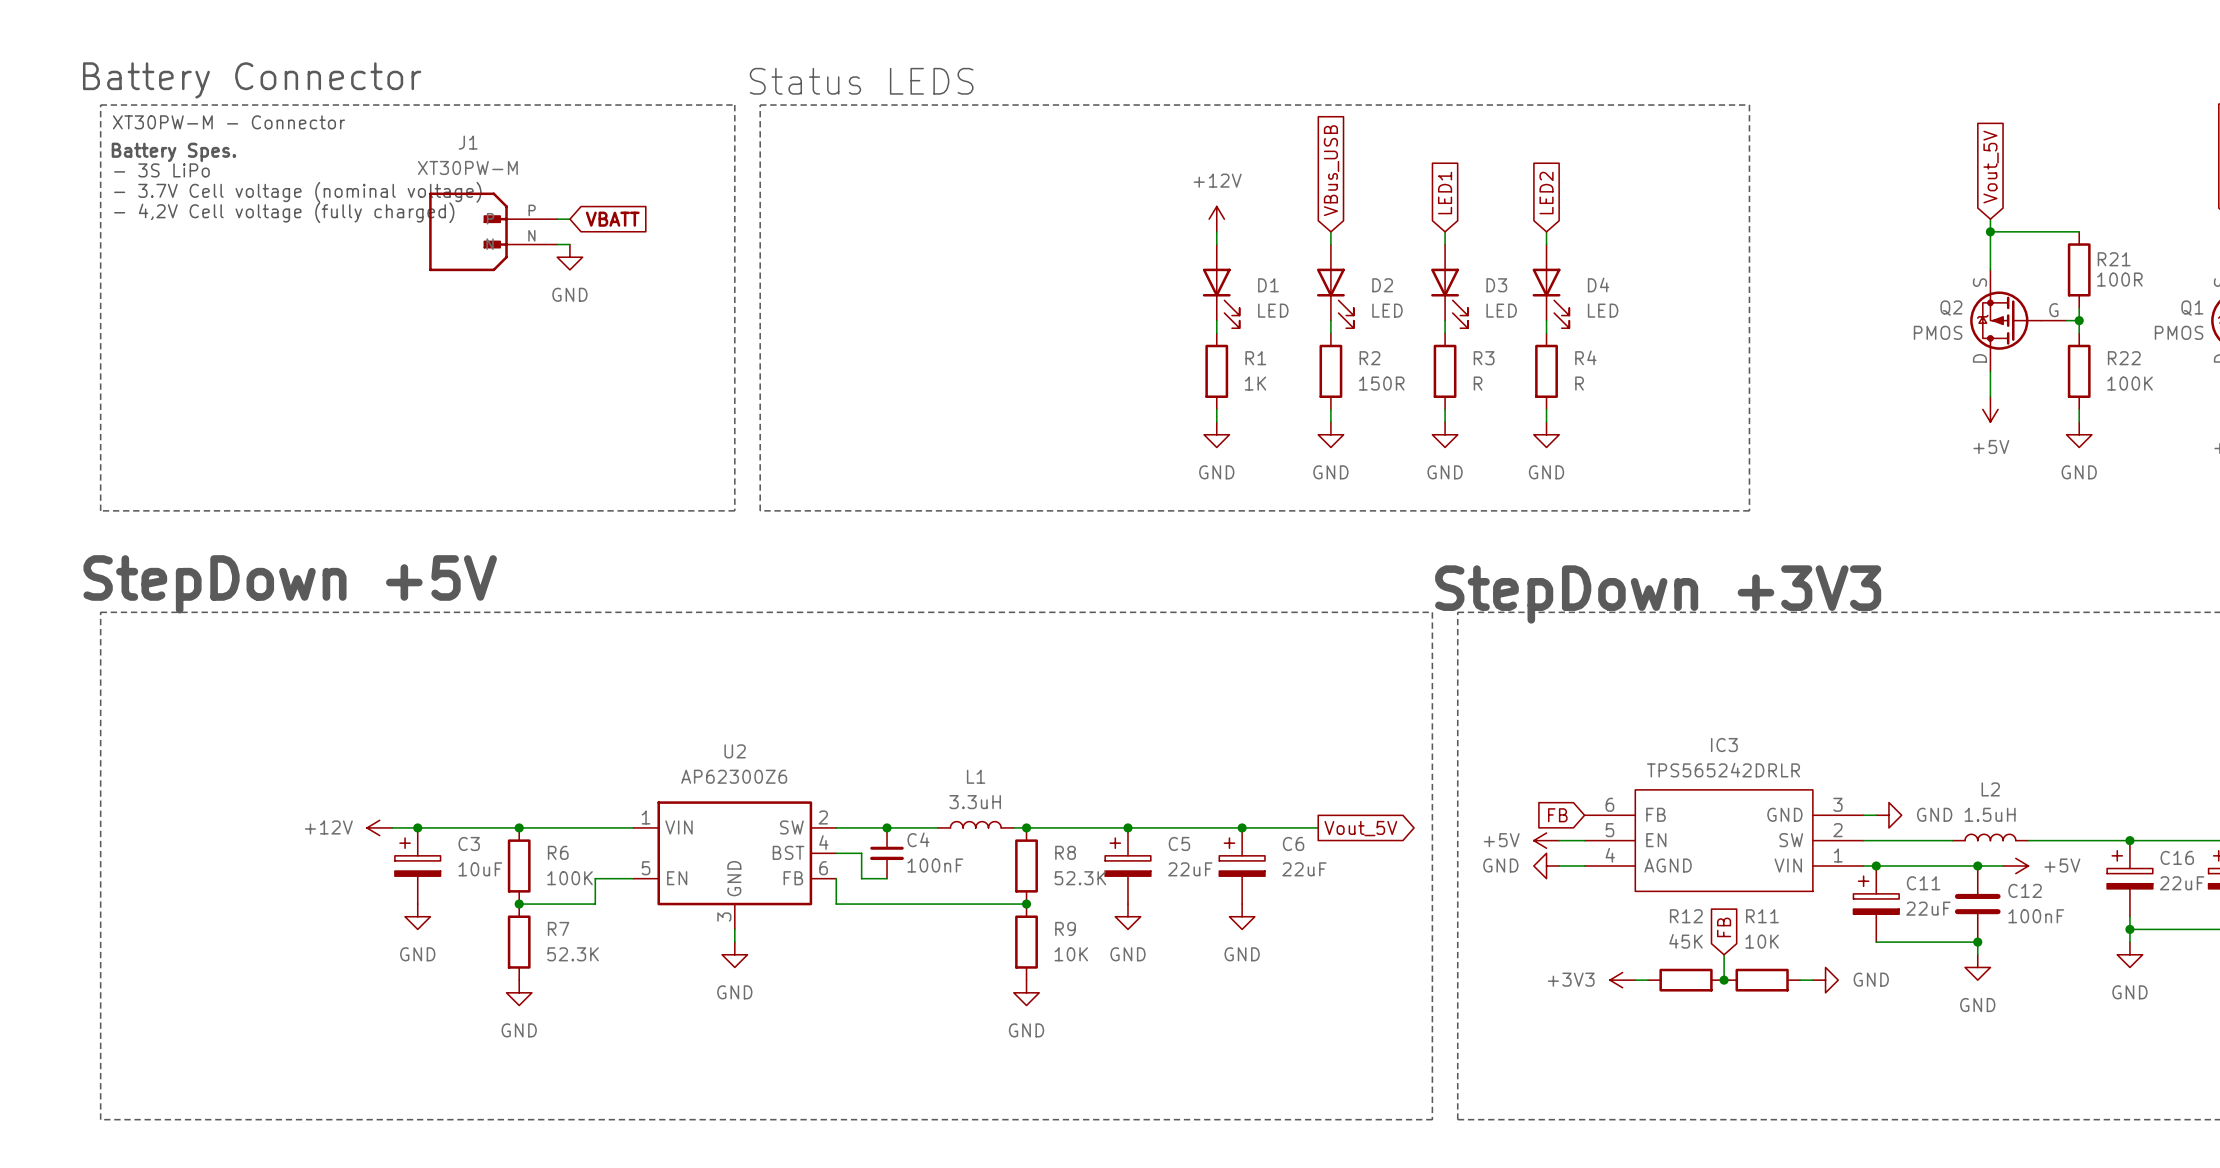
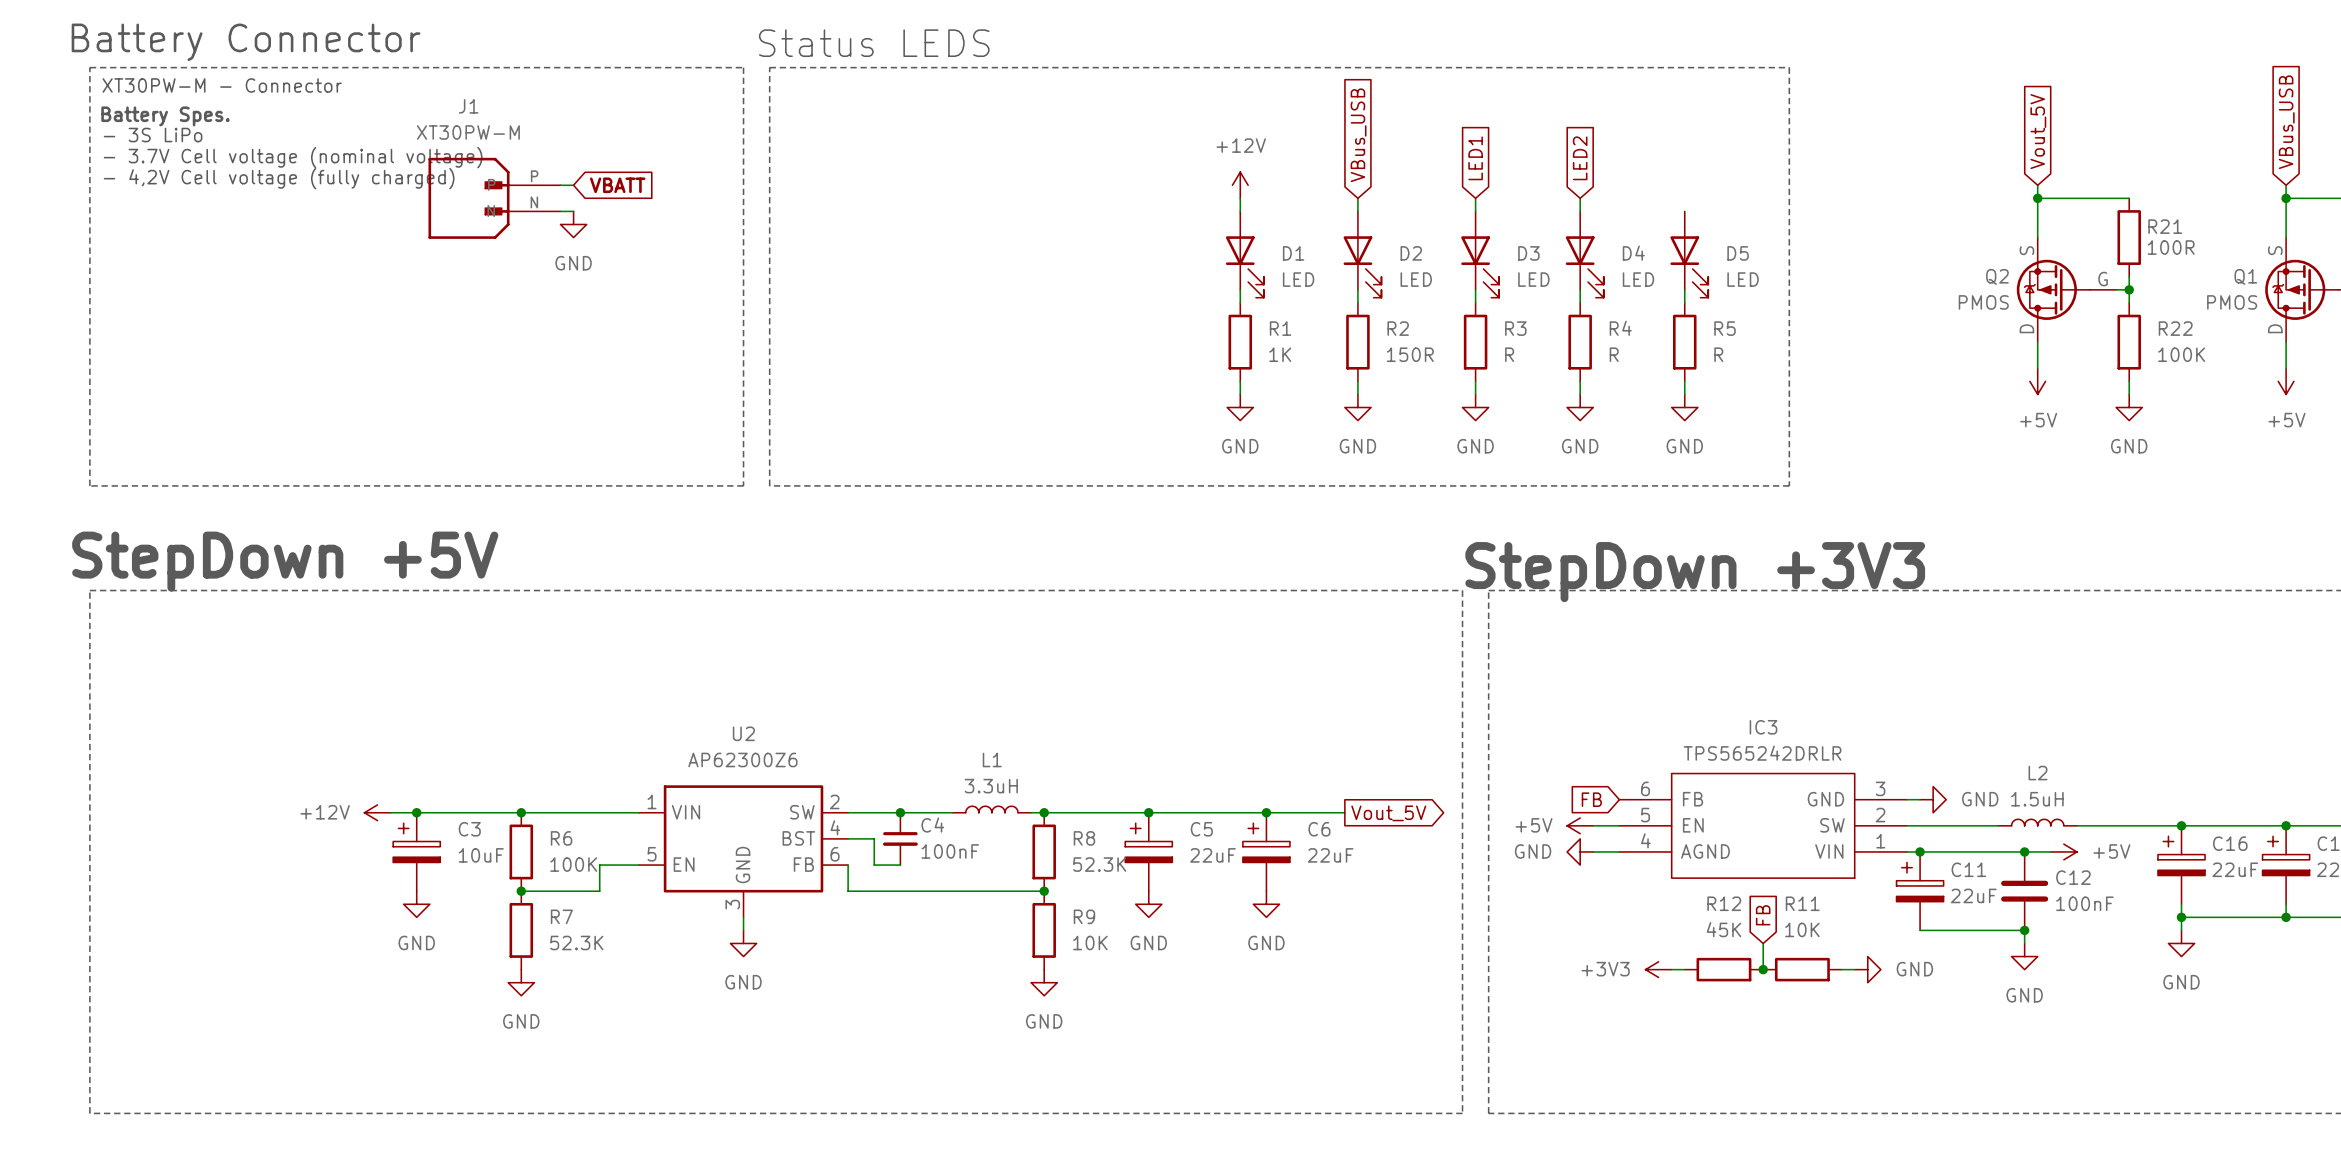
D5: none -> LED (1689, 254)
wire: none -> (1684, 289) (1684, 302)
R5: none -> R (1684, 342)
wire: none -> (1684, 381) (1684, 394)
power symbol: none -> GND (1684, 407)

